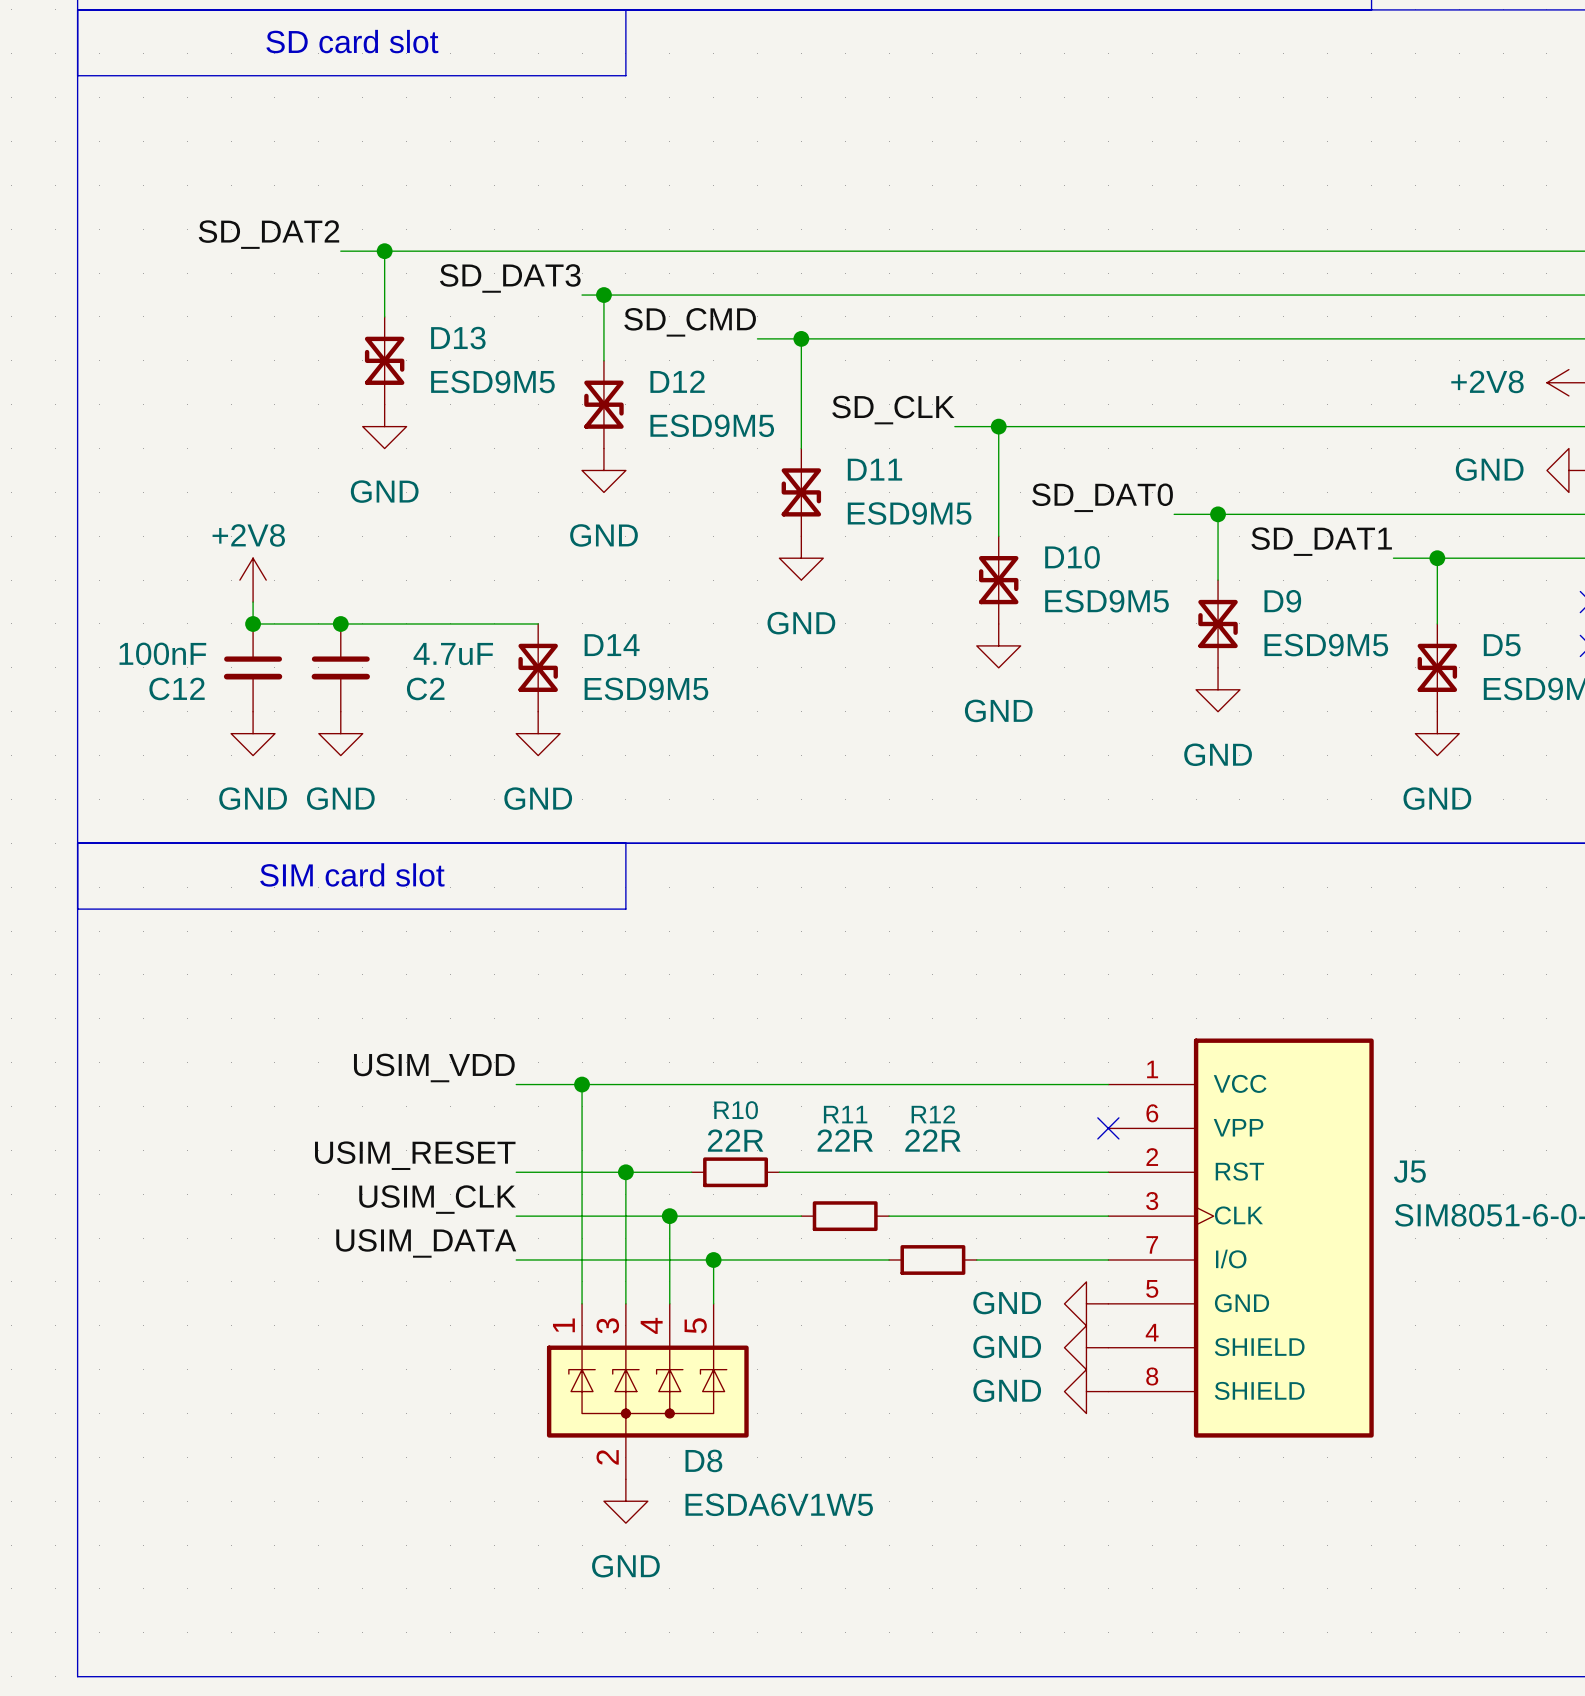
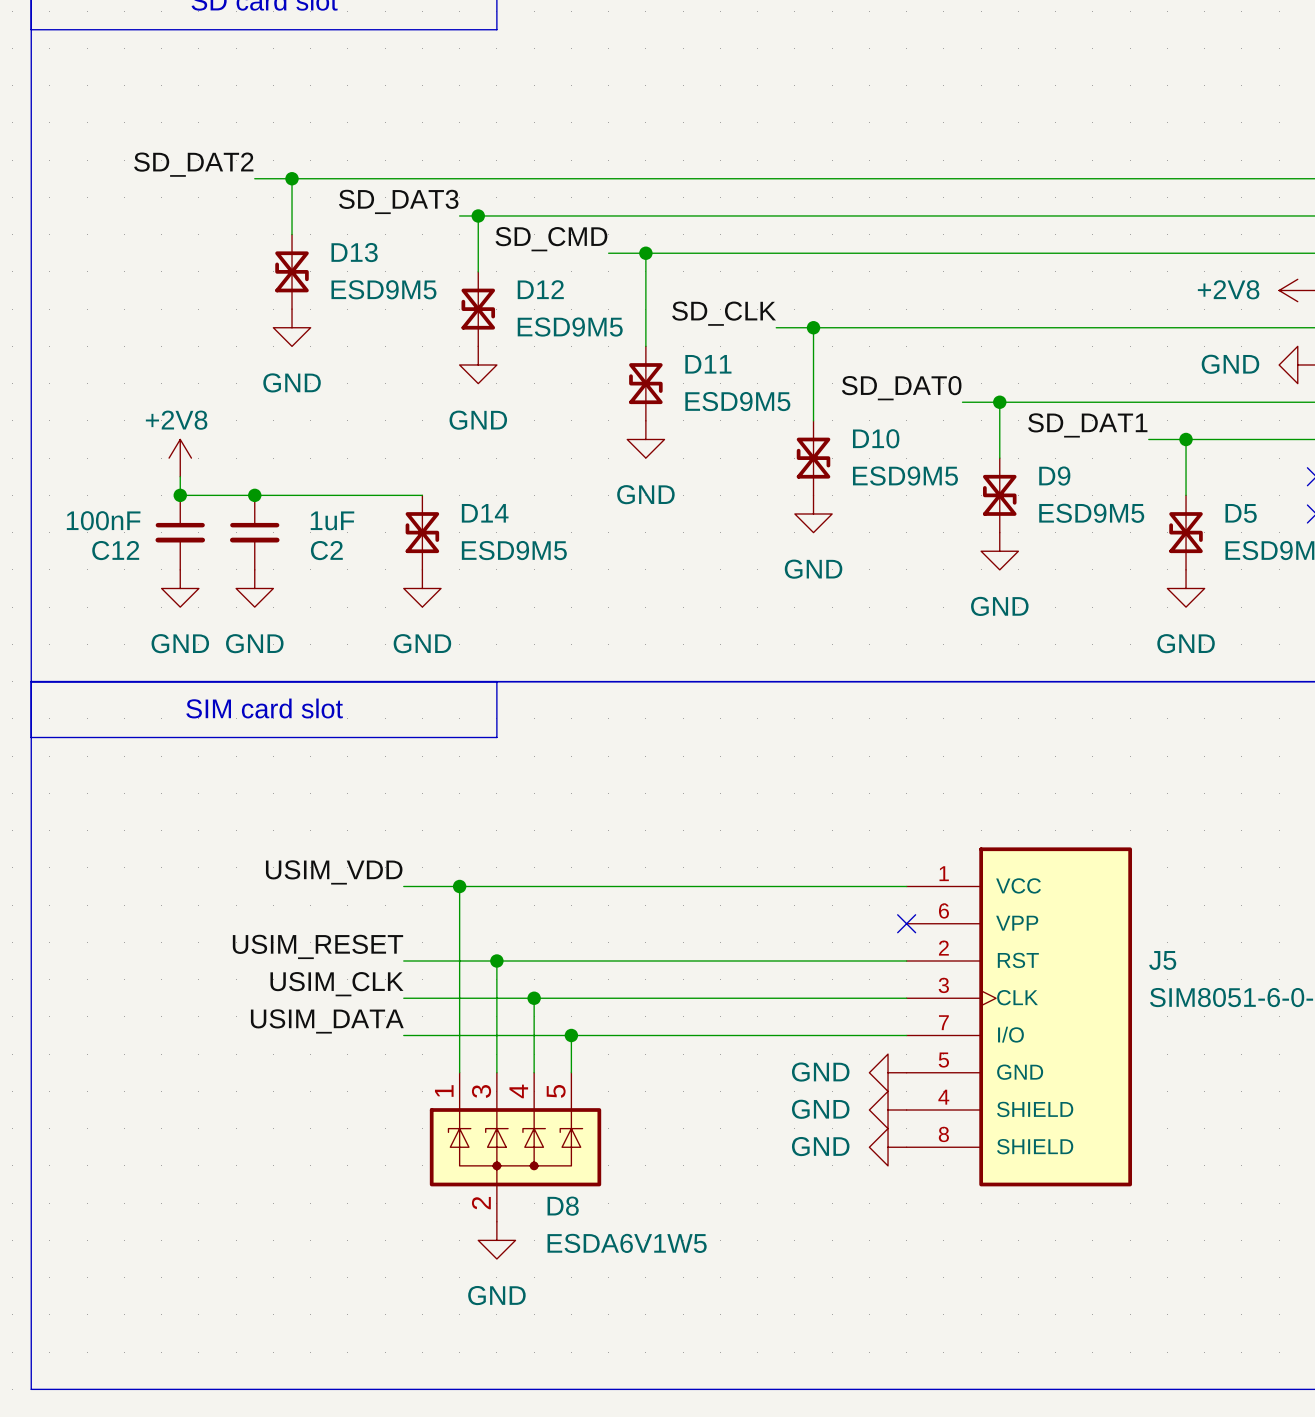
C2 value: 4.7uF (453, 654) -> 1uF (332, 520)
wire: none -> (552, 960) (627, 960)
R10: 22R (735, 1172) -> none
wire: none -> (645, 998) (720, 998)
R11: 22R (845, 1216) -> none
wire: none -> (720, 1035) (794, 1035)
R12: 22R (932, 1259) -> none

